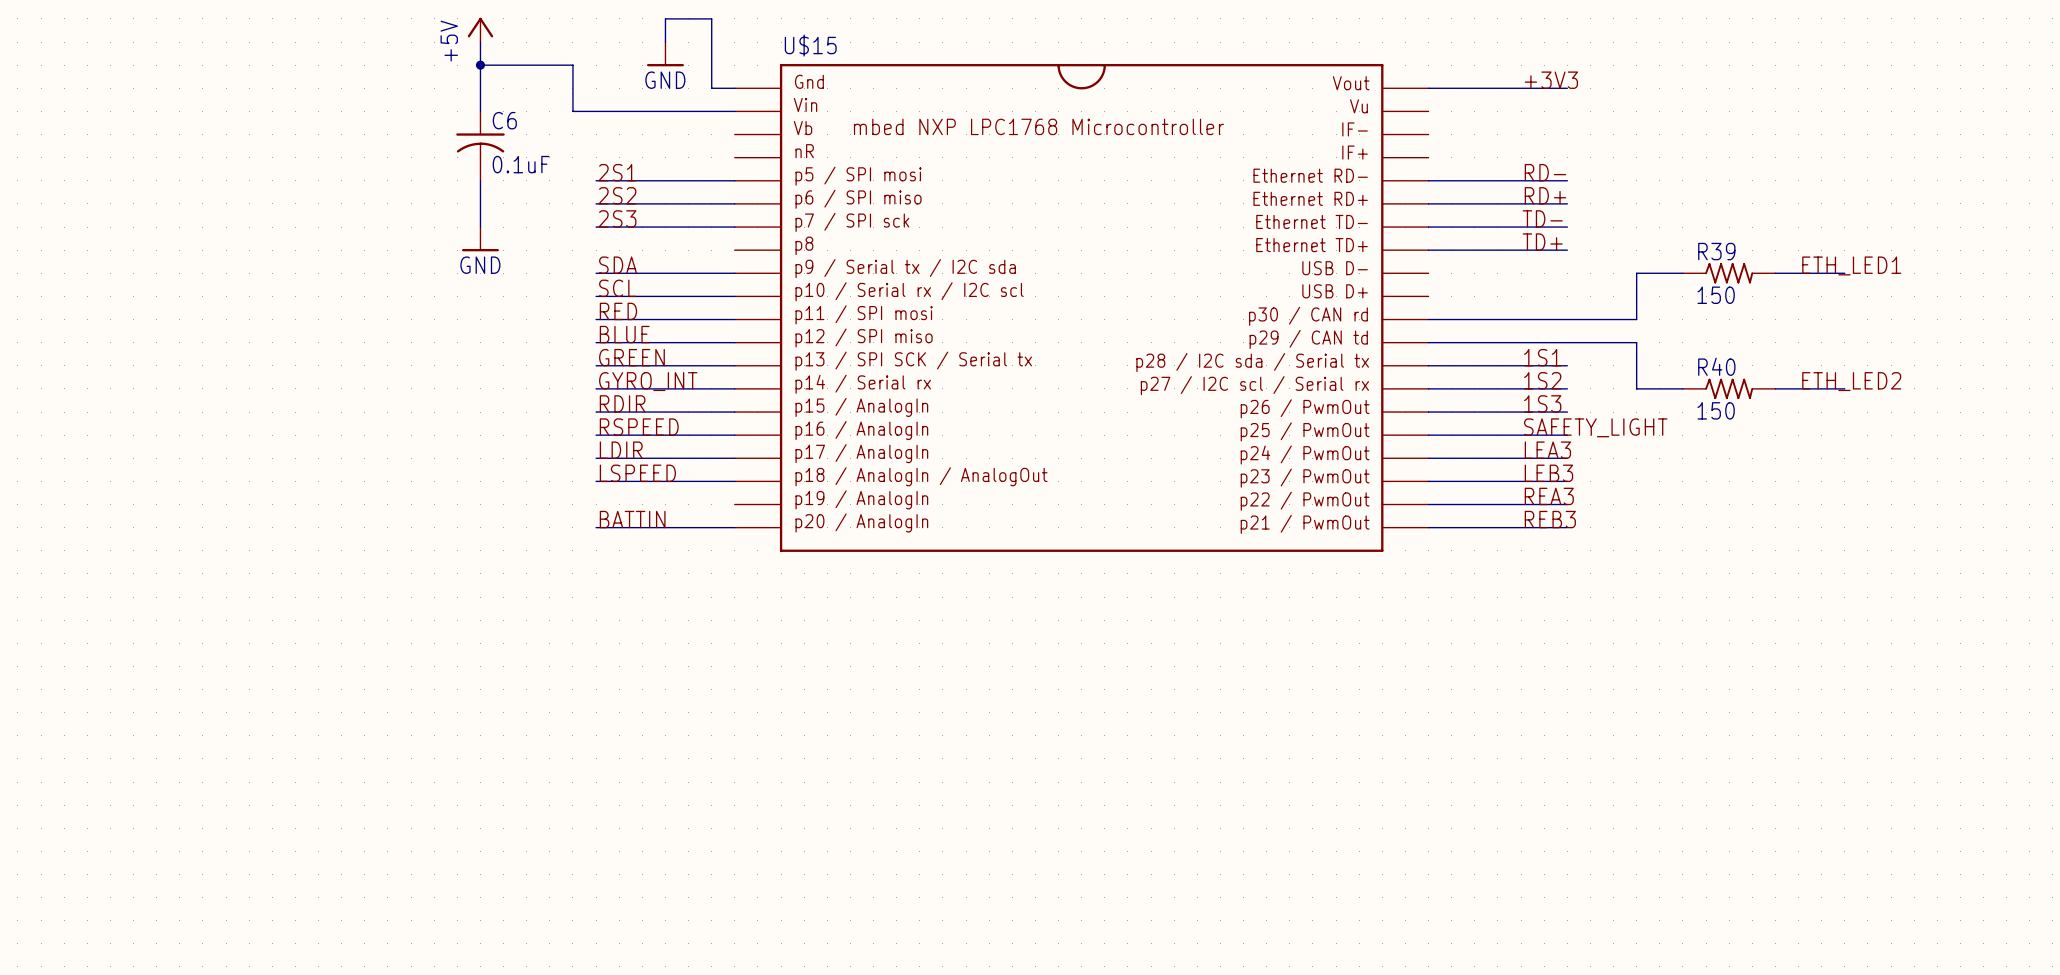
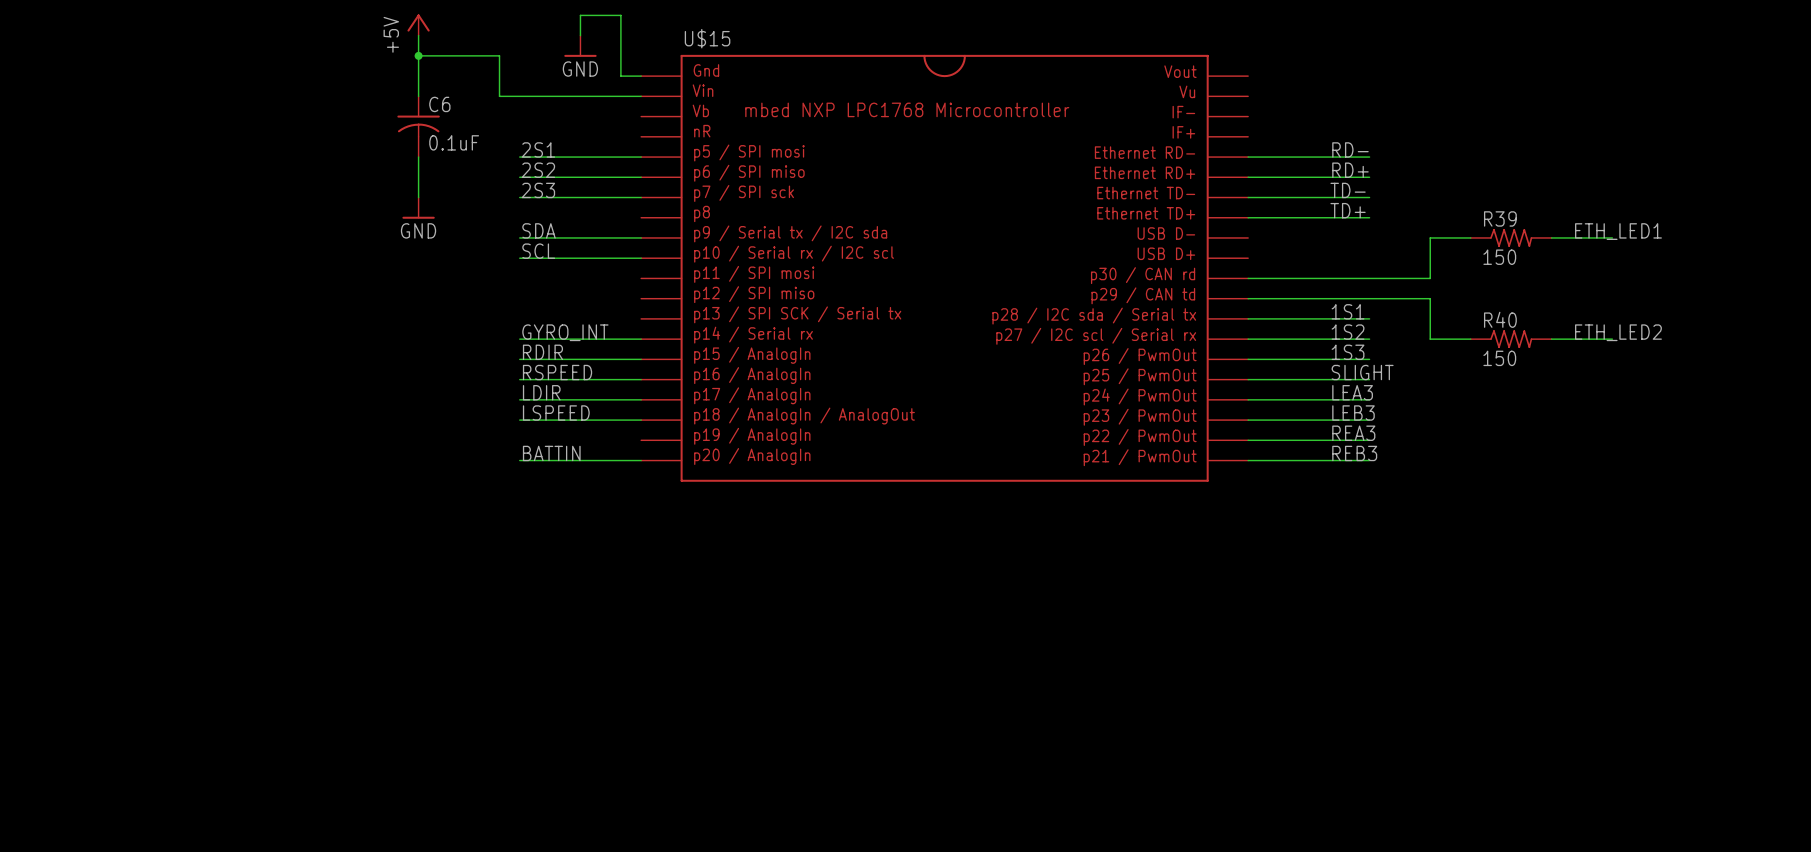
label: +3V3 (1551, 80) -> none
wire: (1428, 88) (1567, 88) -> none
label: RED (618, 311) -> none
wire: (596, 319) (734, 319) -> none
label: BLUE (624, 334) -> none
wire: (596, 342) (734, 342) -> none
label: GREEN (631, 357) -> none
wire: (596, 365) (734, 365) -> none
label: SAFETY_LIGHT (1595, 427) -> SLIGHT (1362, 372)

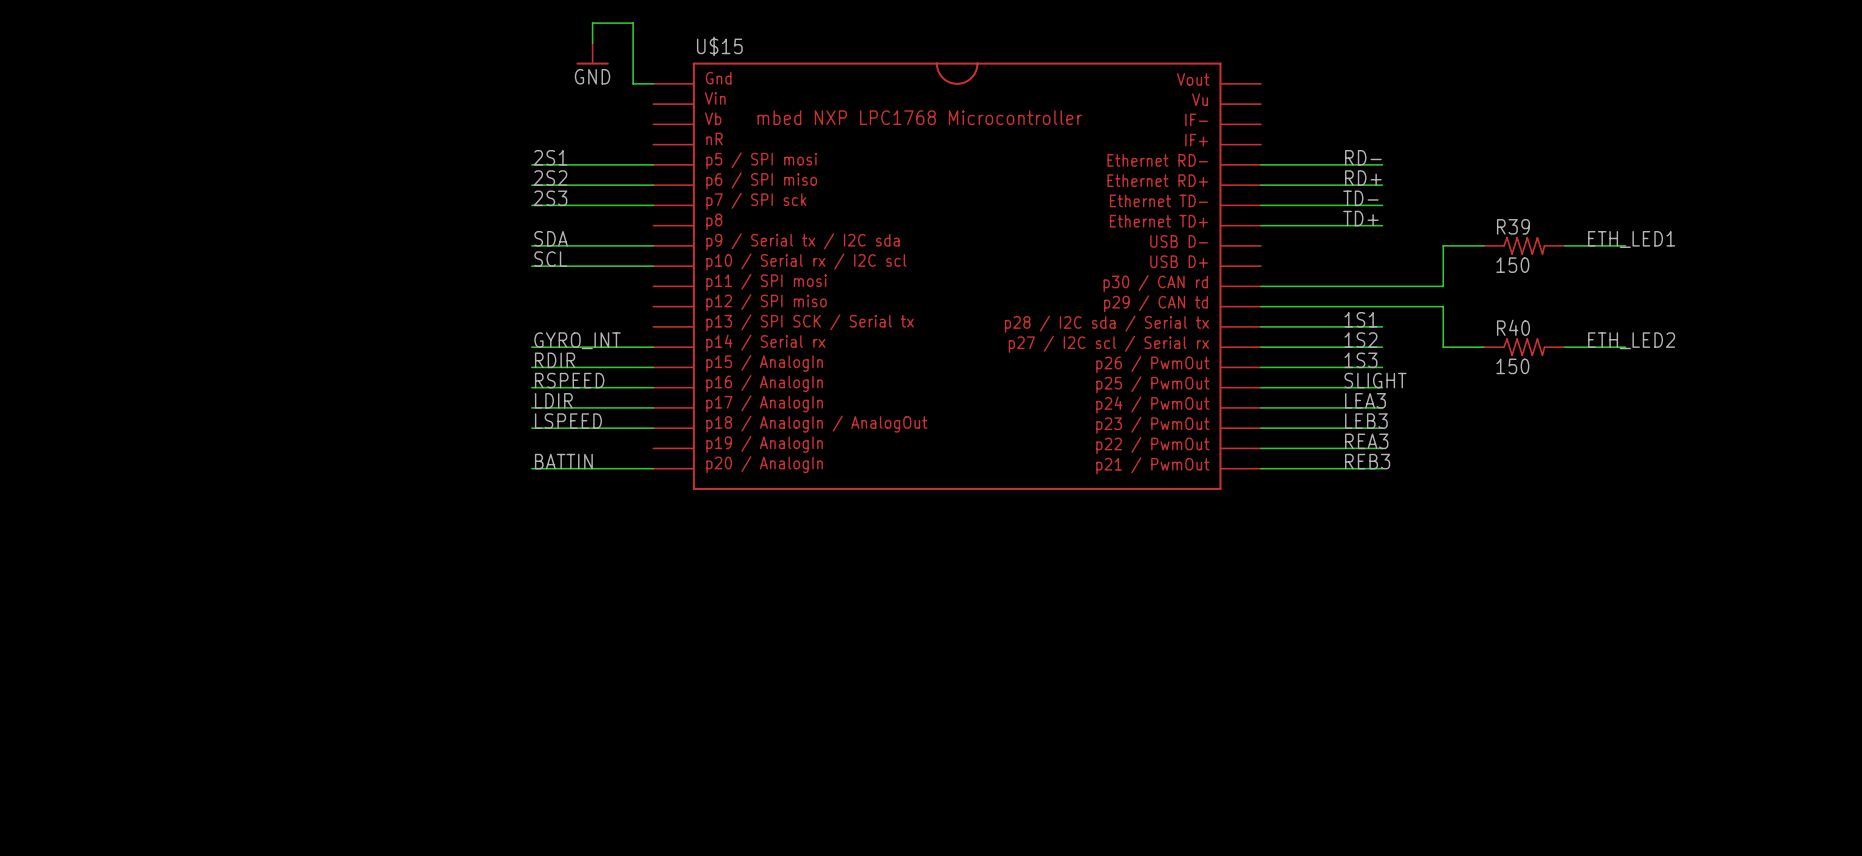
power symbol: +5V (418, 25) -> none
wire: (418, 35) (418, 96) -> none
wire: (418, 55) (499, 55) (499, 96) (641, 96) -> none
junction: (418, 55) -> none
C6: 0.1uF (418, 126) -> none
wire: (418, 157) (418, 197) -> none
power symbol: GND (418, 208) -> none

